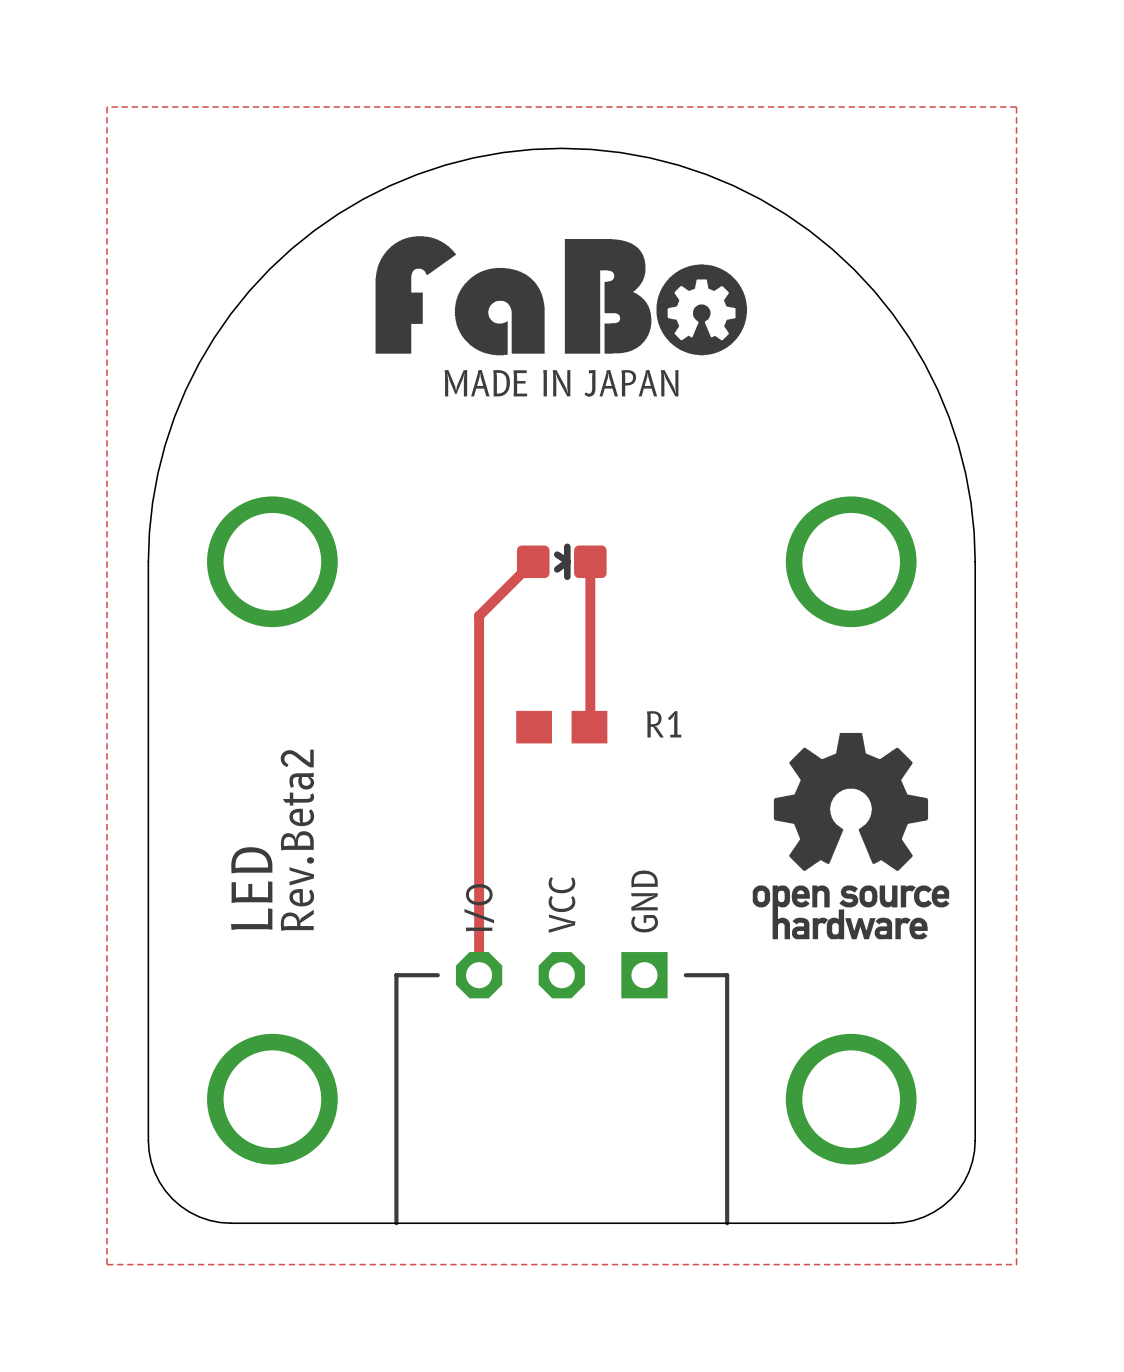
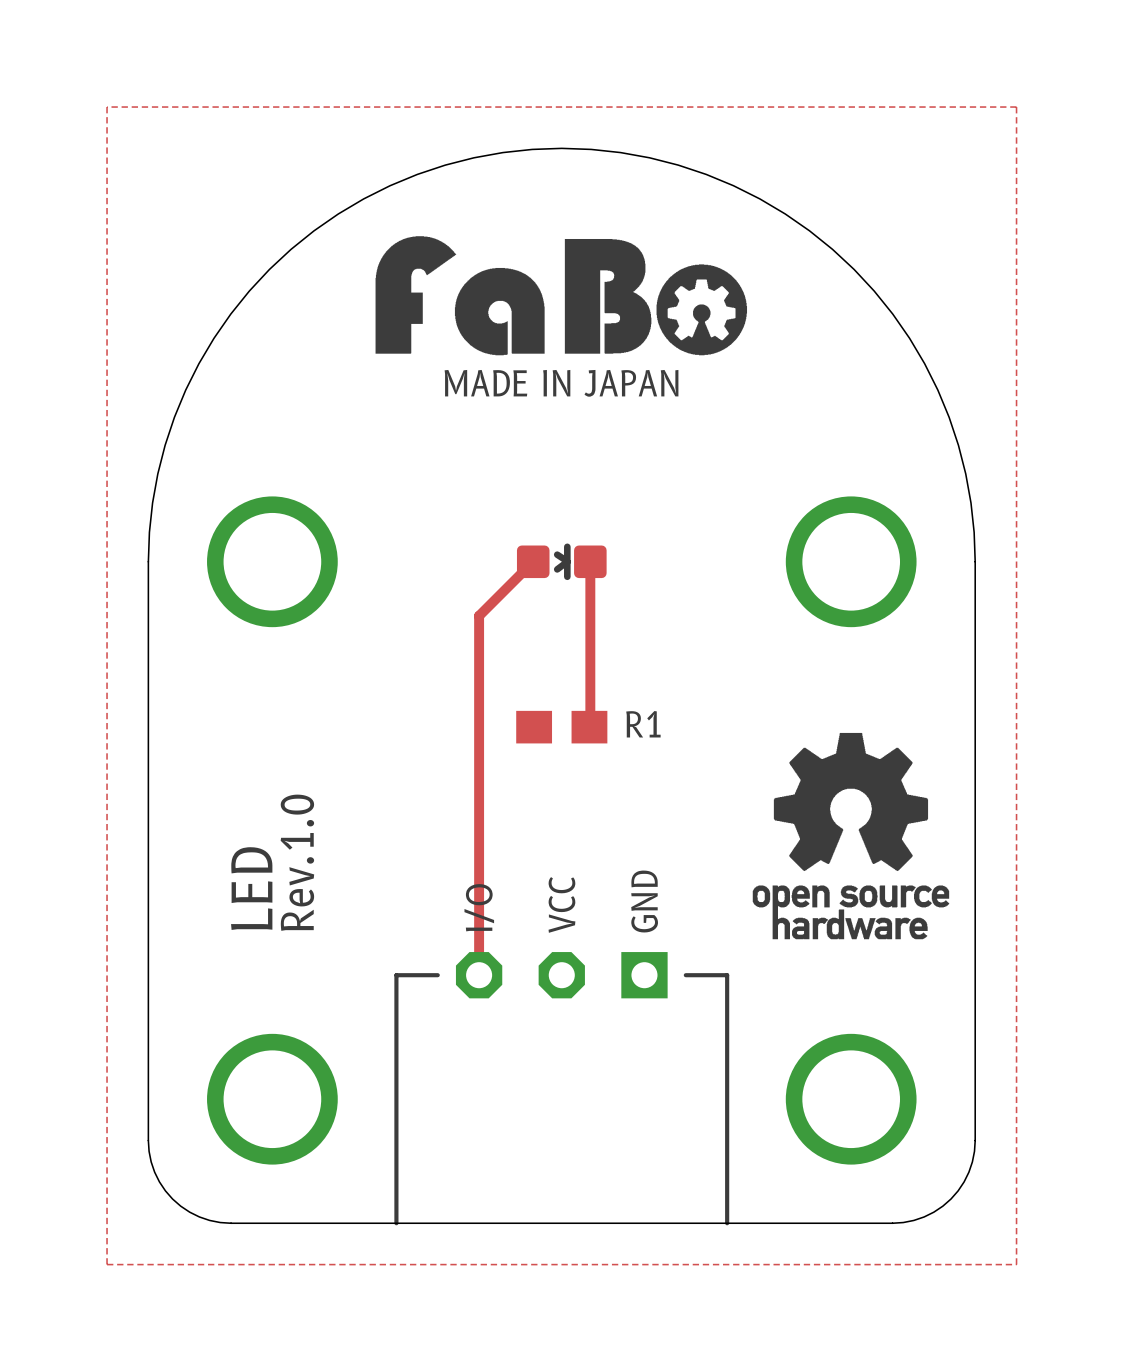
R1 name position: R1 (664, 724) -> R1 (643, 724)
text: Rev.Beta2 (297, 840) -> Rev.1.0 (297, 862)

